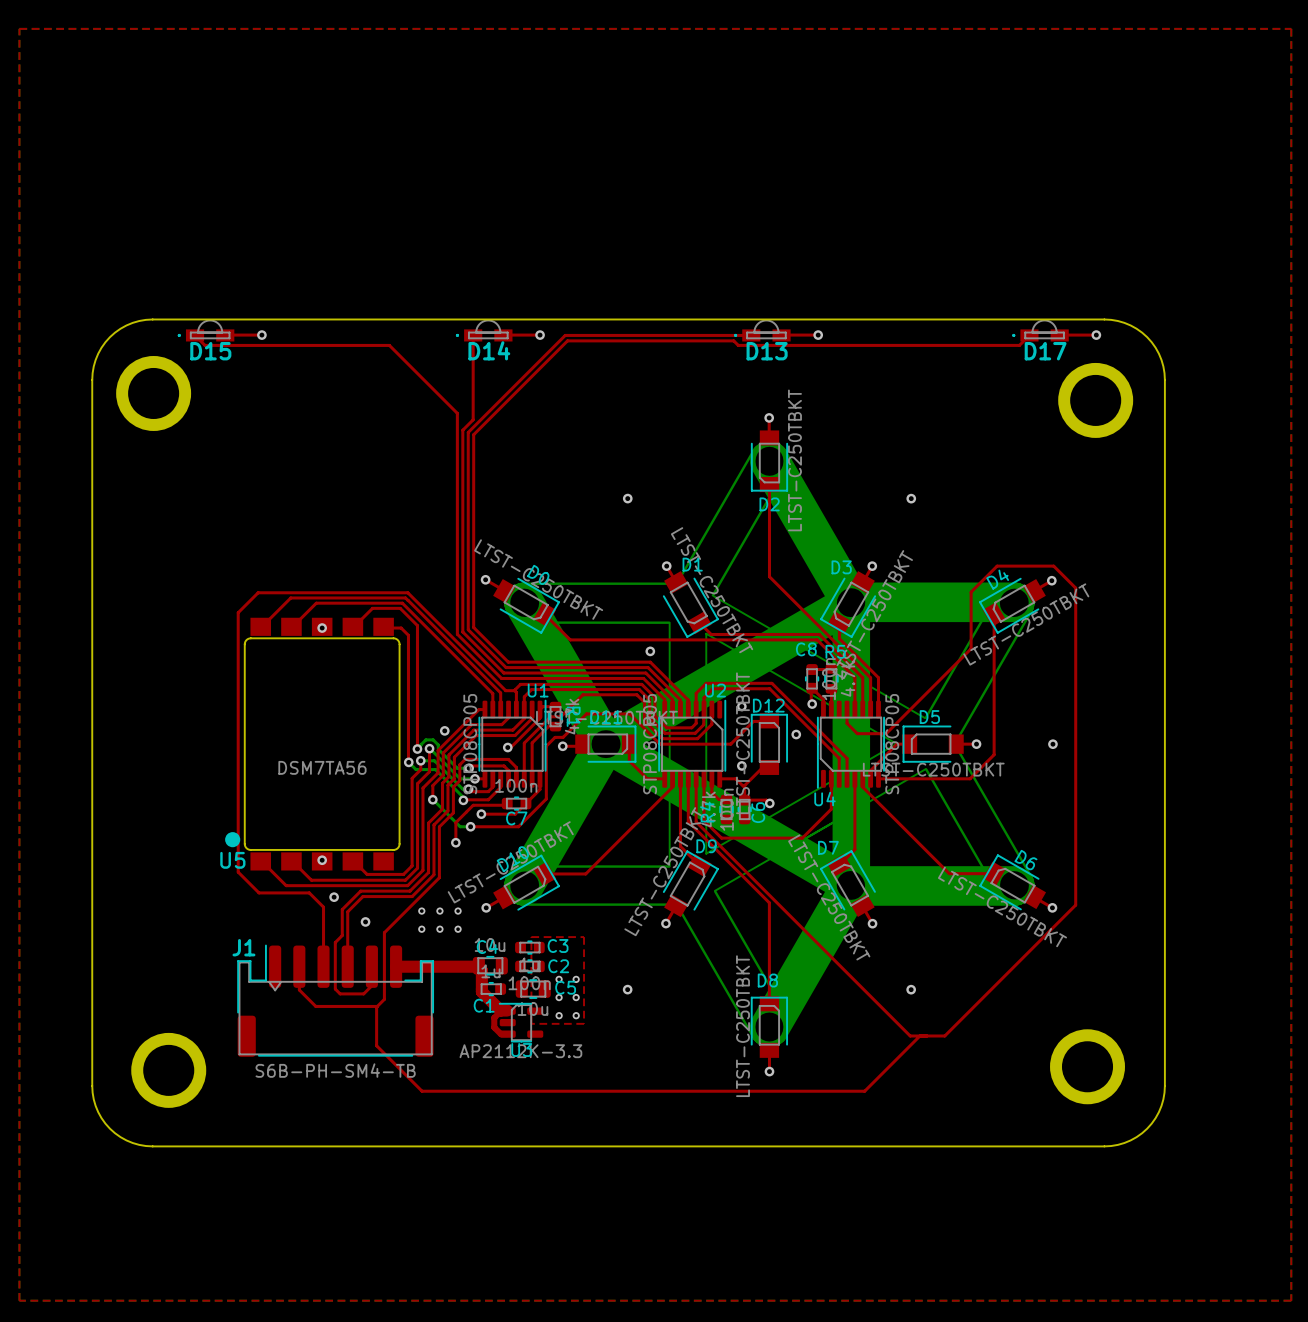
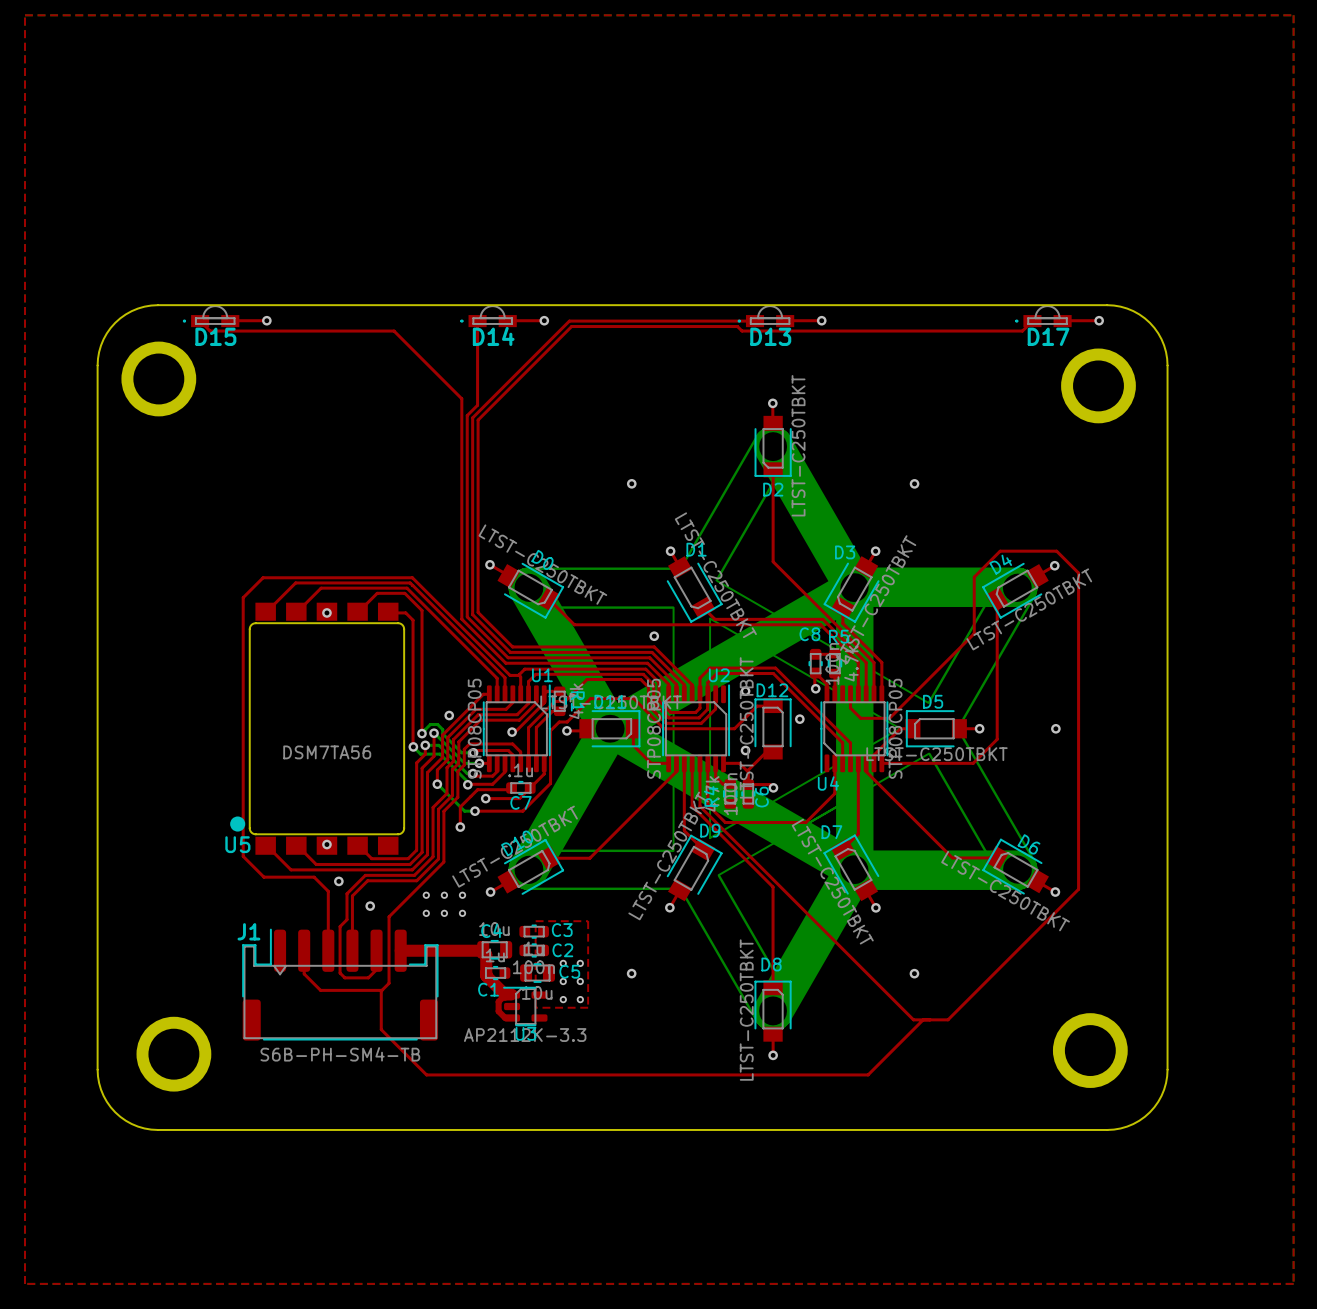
C7 value: 100n (516, 785) -> .1u (520, 770)

